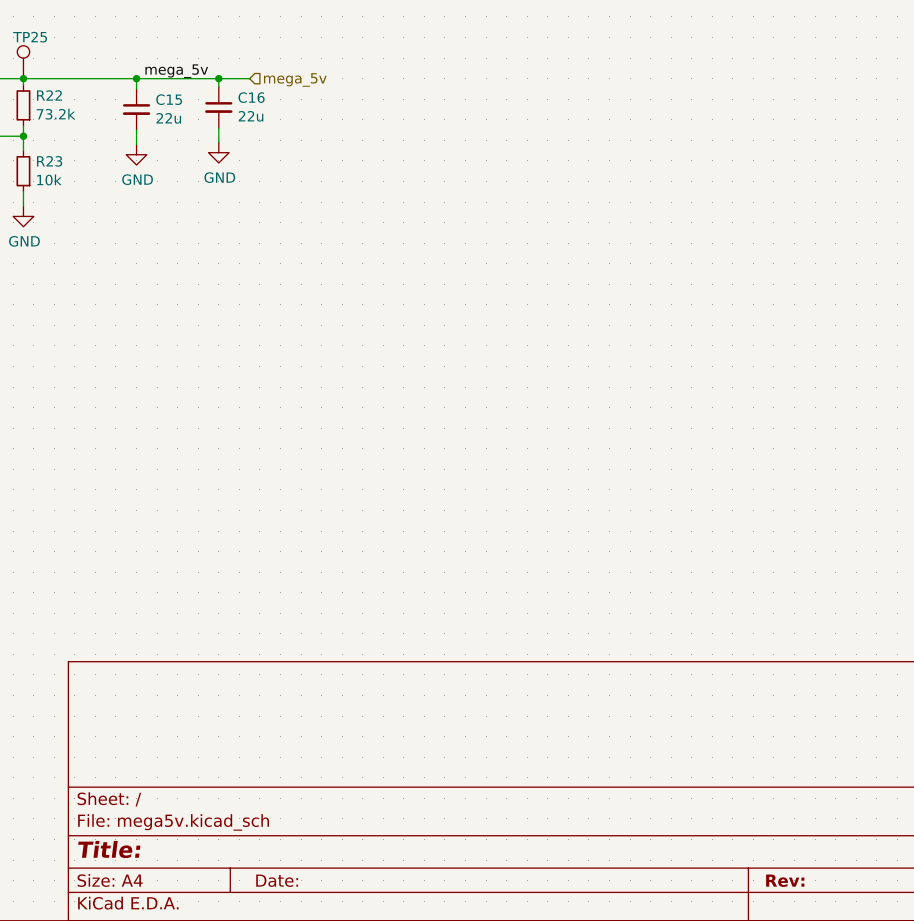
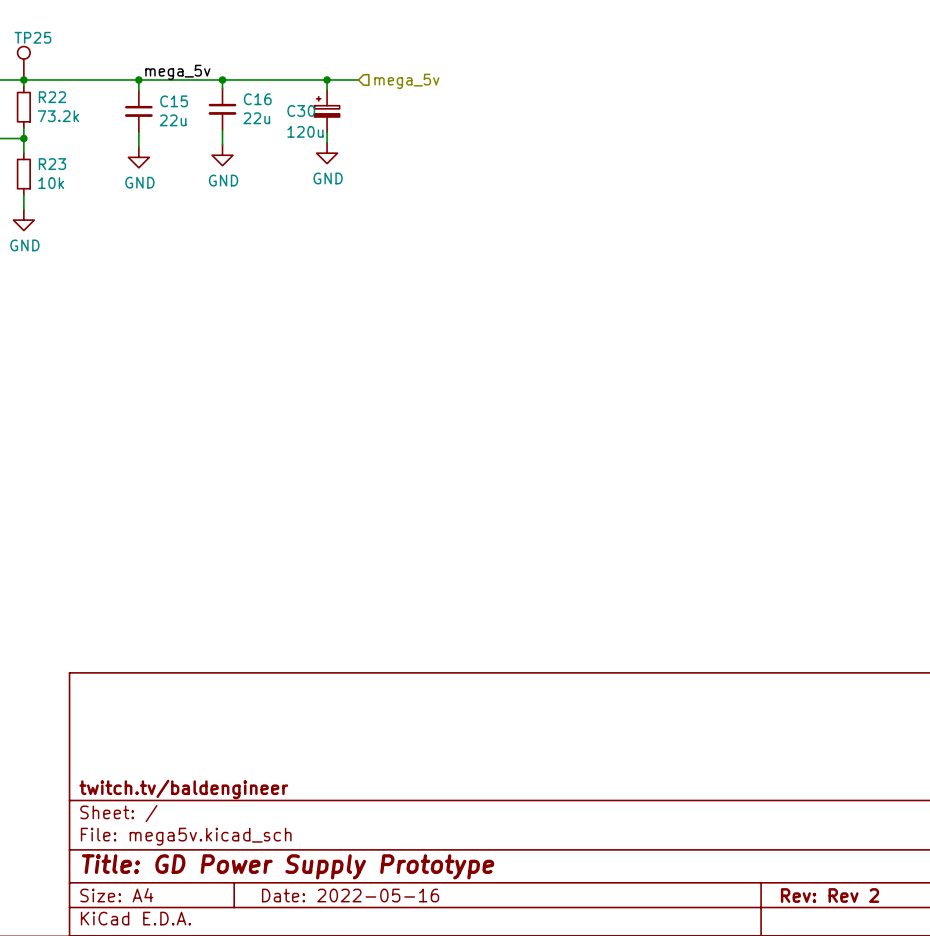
wire: none -> (253, 79) (358, 79)
wire: none -> (327, 79) (327, 90)
junction: none -> (327, 79)
hierarchical label position: mega_5v (295, 79) -> mega_5v (406, 81)
C30: none -> 120u (327, 111)
wire: none -> (327, 132) (327, 142)
power symbol: none -> GND (327, 153)
title block: none -> twitch.tv/baldengineer (183, 789)
title block: Title: (109, 849) -> Title: GD Power Supply Prototype (288, 866)
title block: Date: (277, 880) -> Date: 2022-05-16 (350, 895)
title block: Rev: (785, 880) -> Rev: Rev 2 (830, 895)

